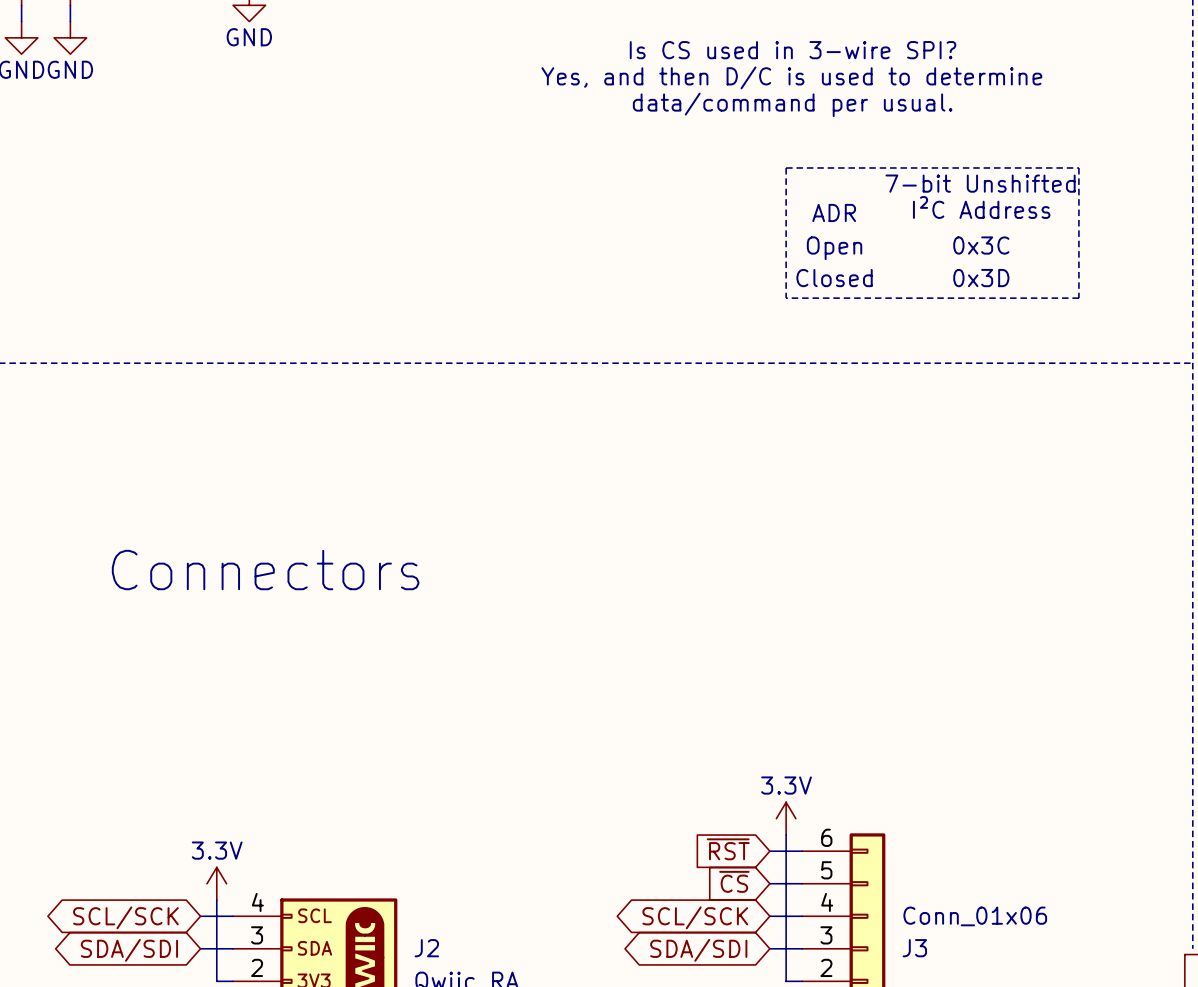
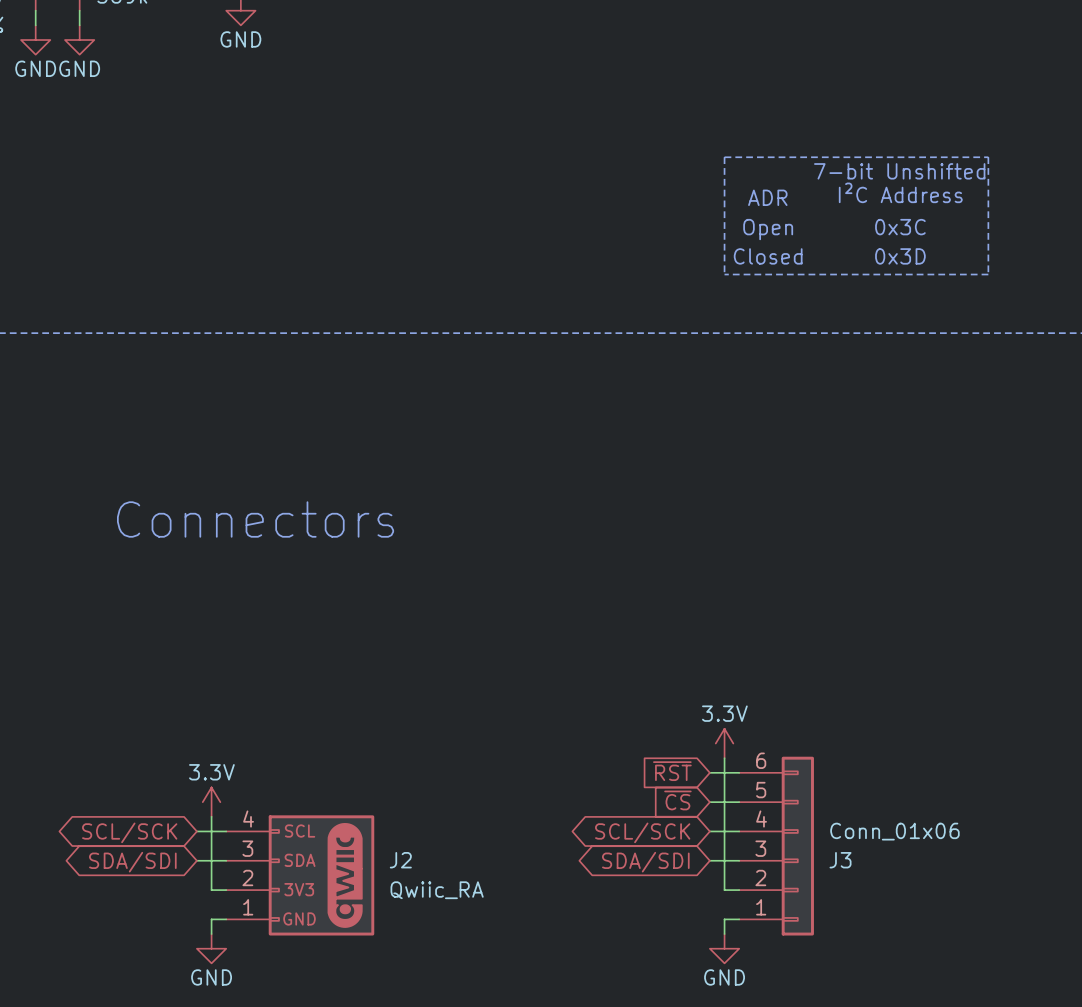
text: Is CS used in 3-wire SPI? (793, 50) -> none
text: Yes, and then D/C is used to determine (791, 77) -> none
text: data/command per usual. (792, 104) -> none

